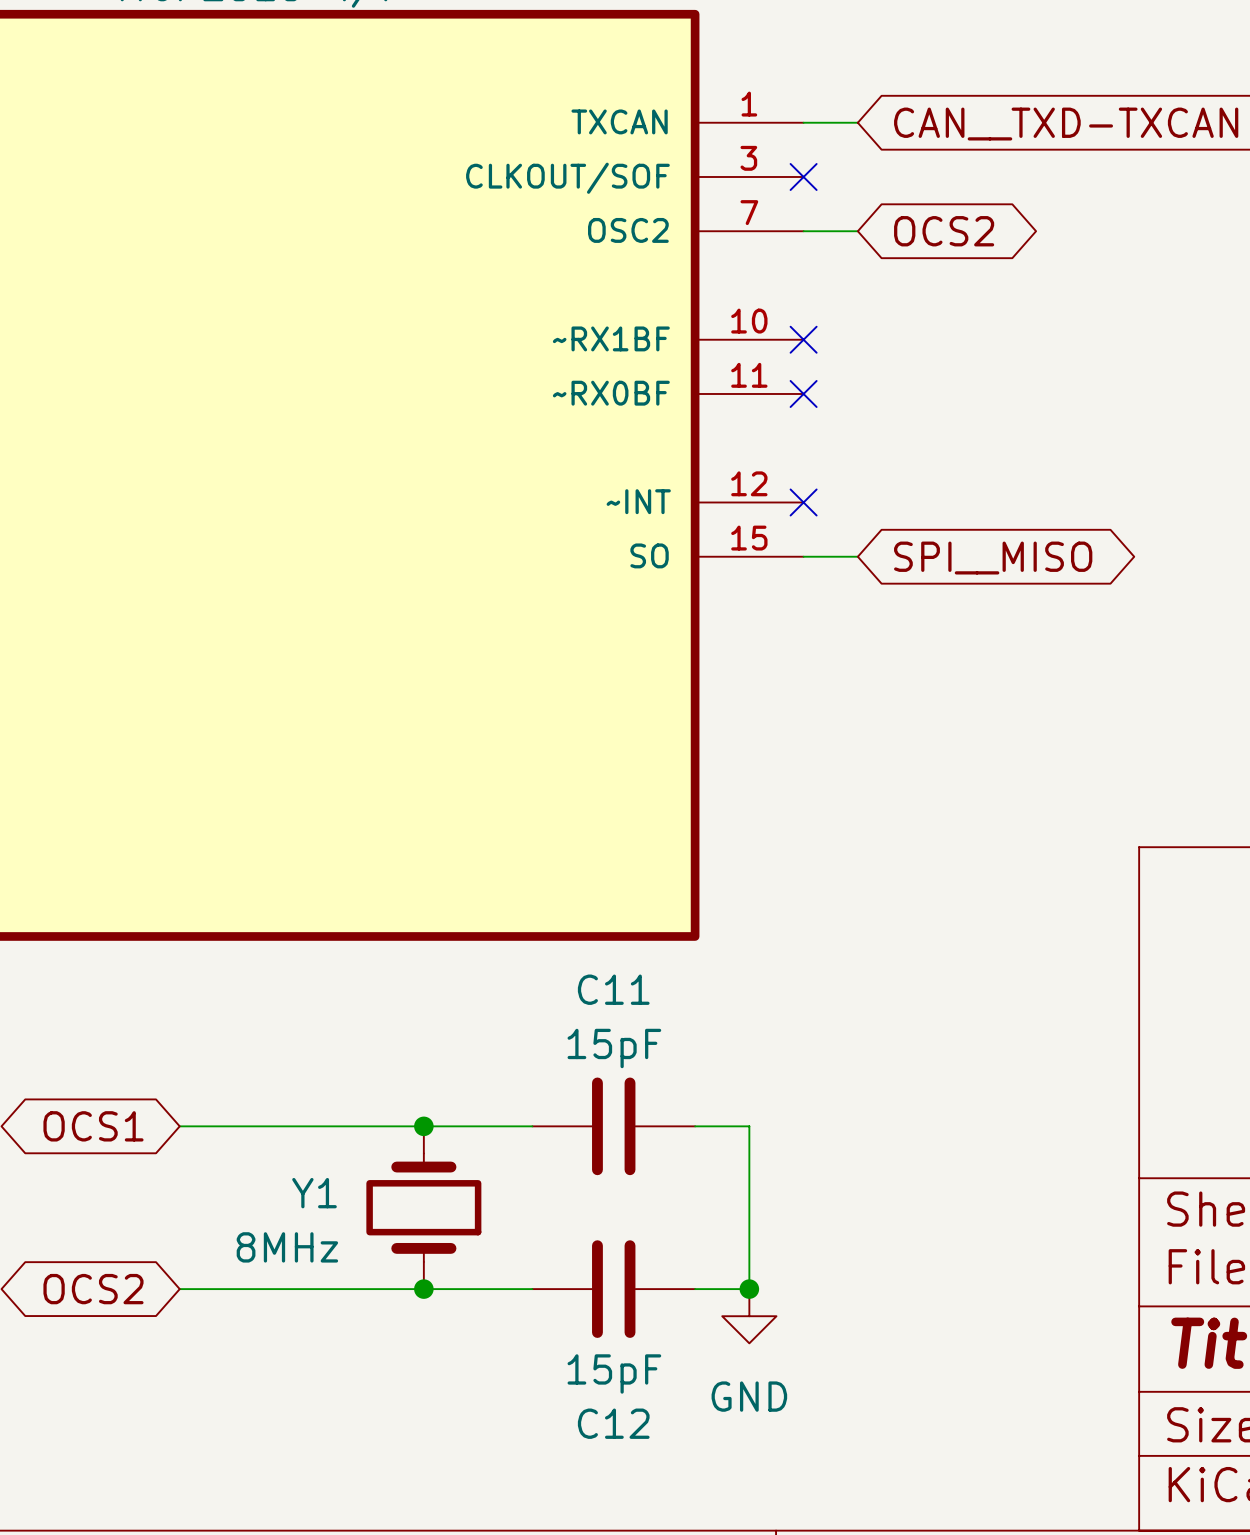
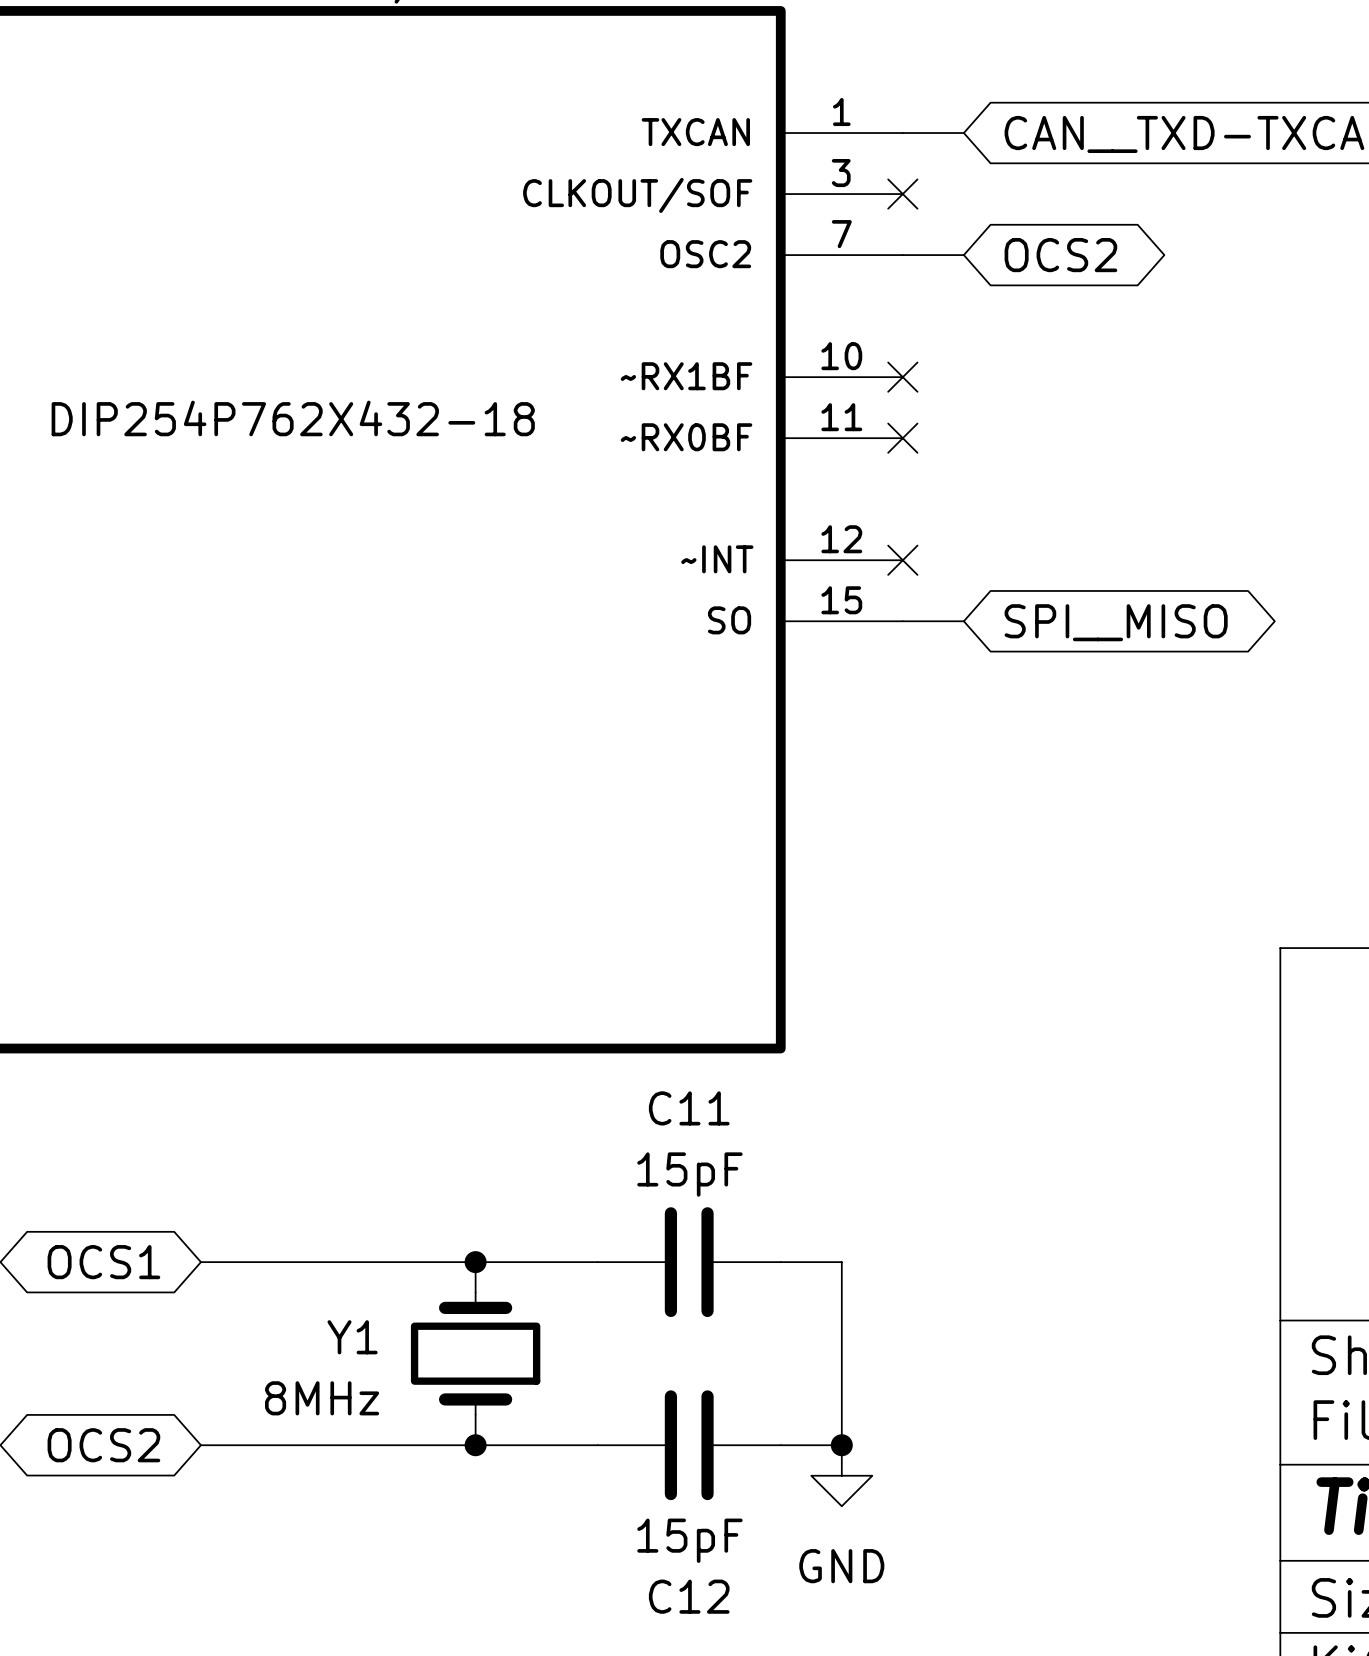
part text: none -> DIP254P762X432-18 (293, 418)

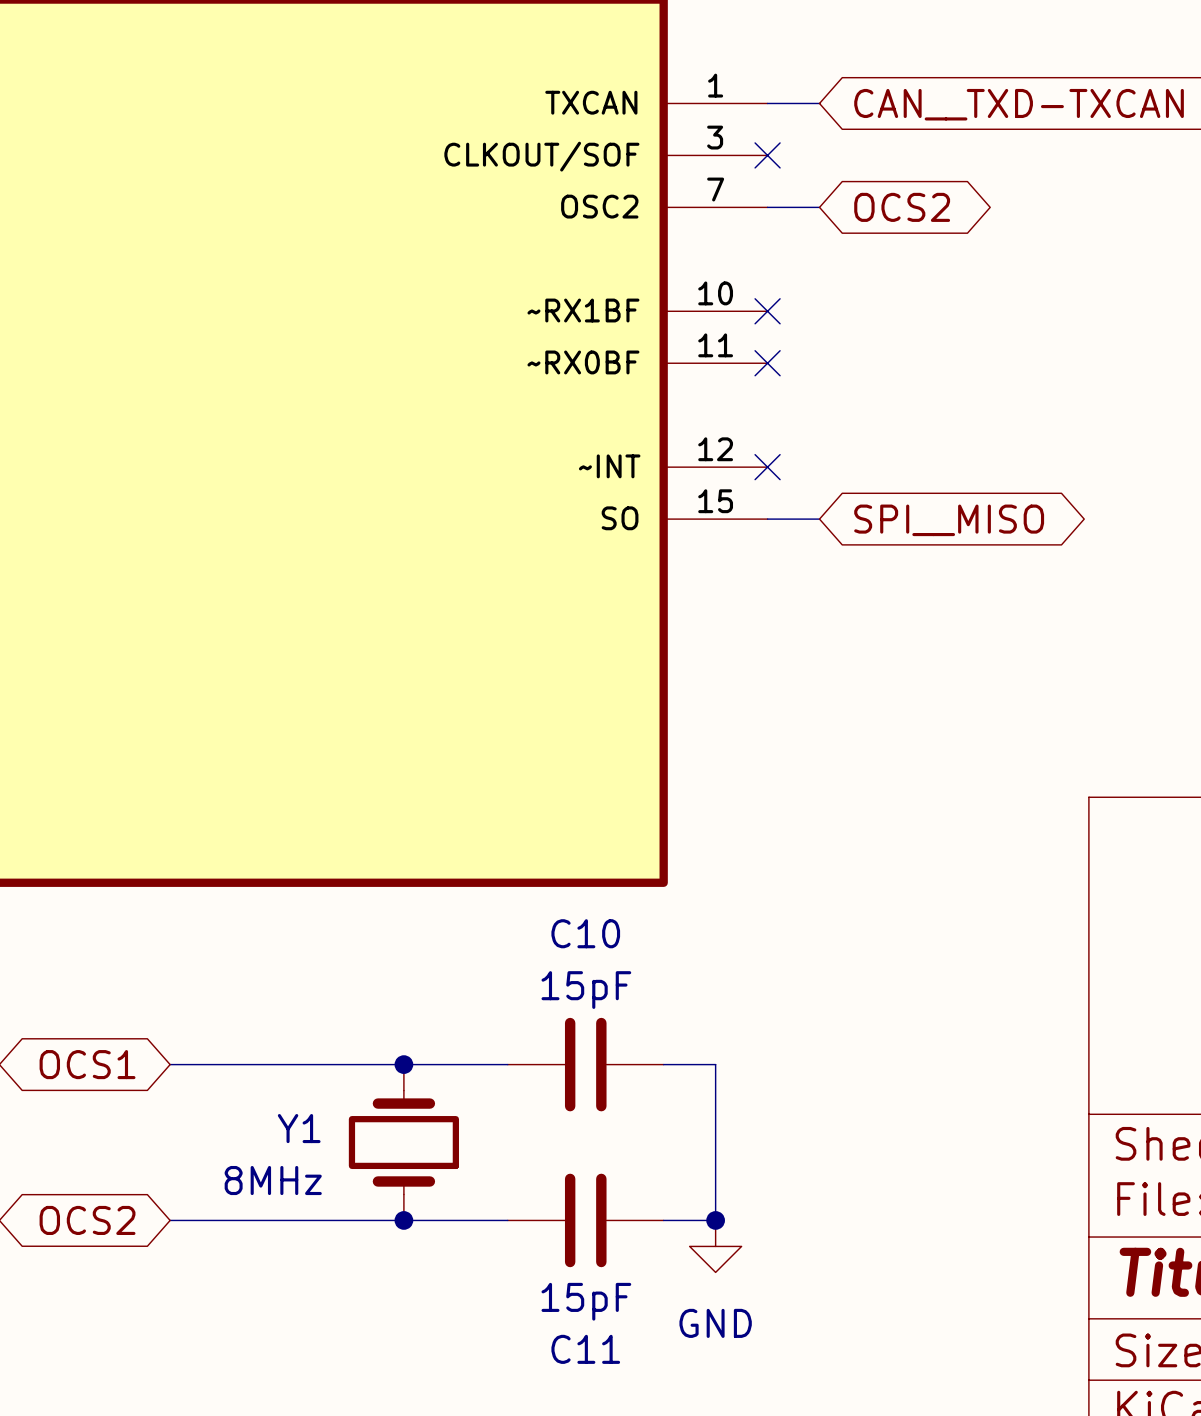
part text: DIP254P762X432-18 (293, 418) -> none
C11 name: C11 (689, 1108) -> C10 (585, 933)
C12 name: C12 (689, 1596) -> C11 (585, 1349)

